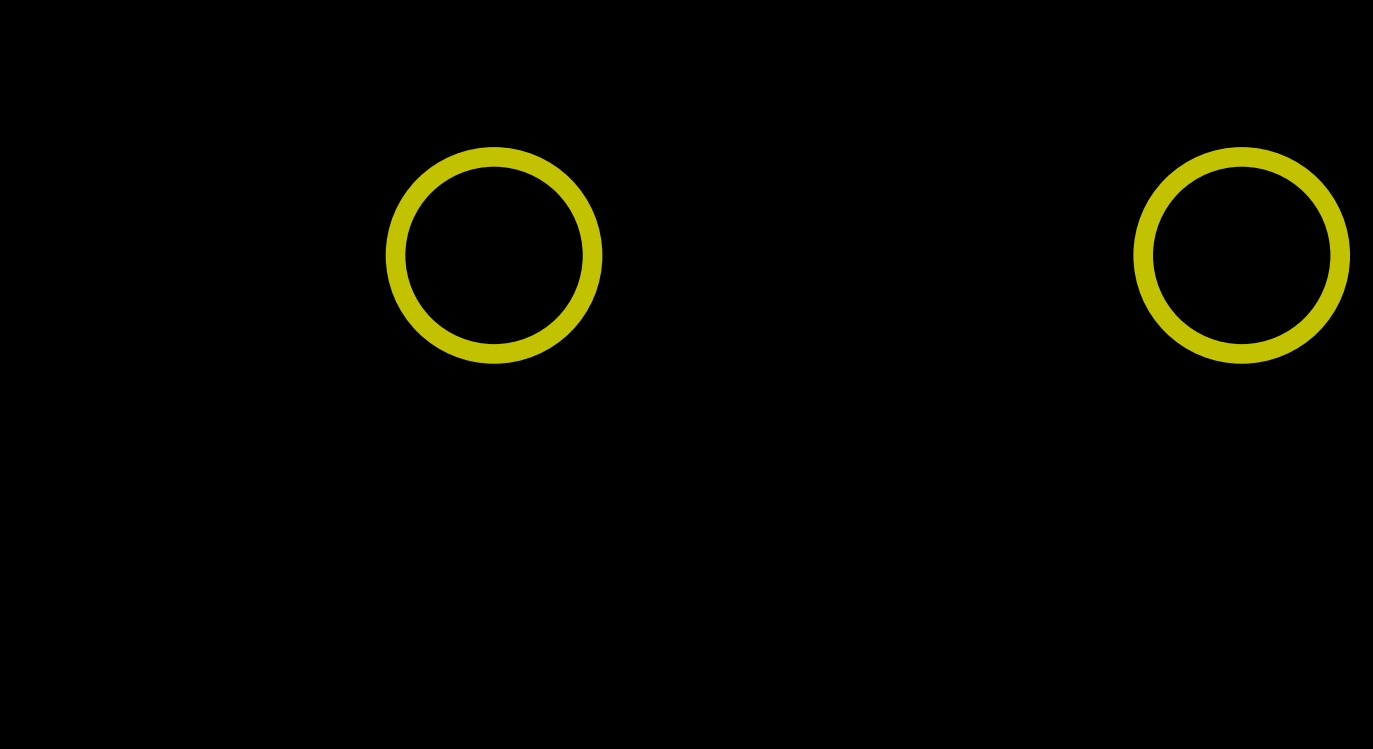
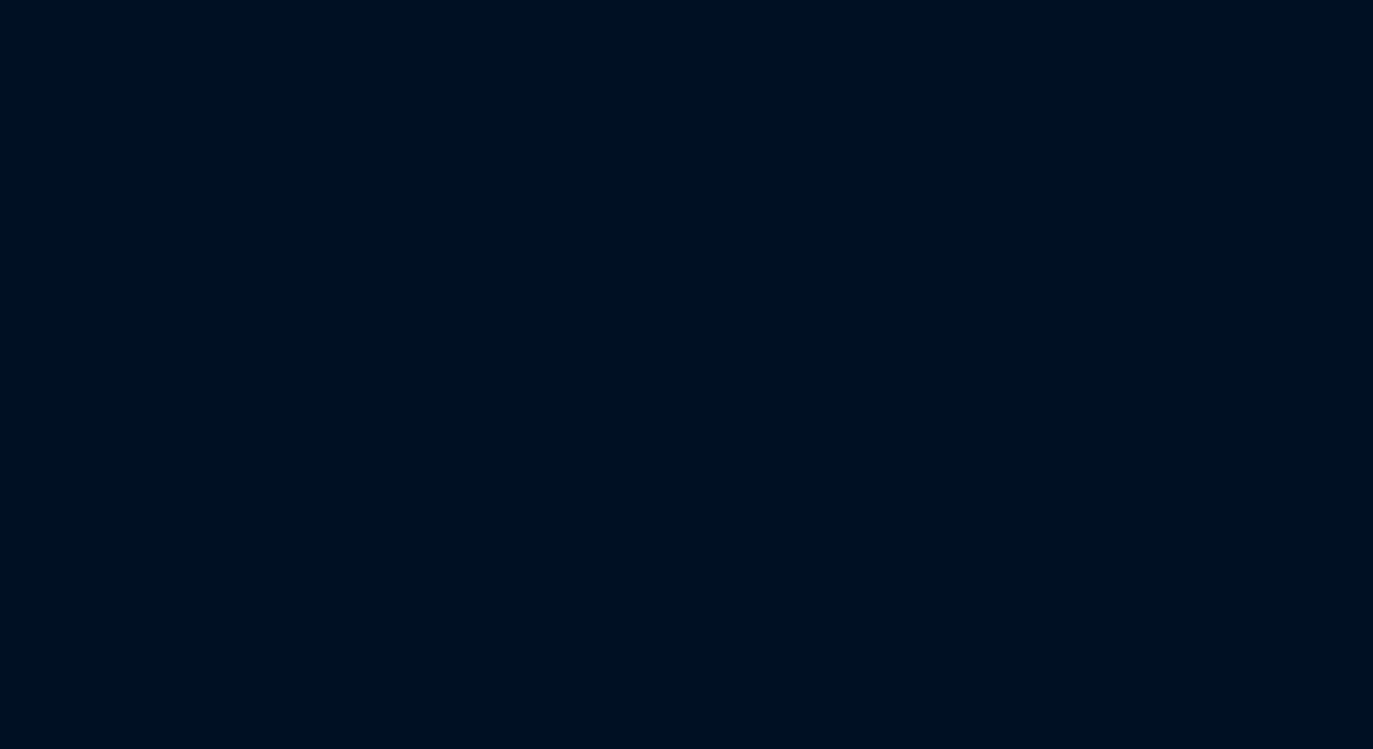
round board edge: [385, 147, 603, 364] -> none
round board edge: [1133, 147, 1351, 364] -> none

